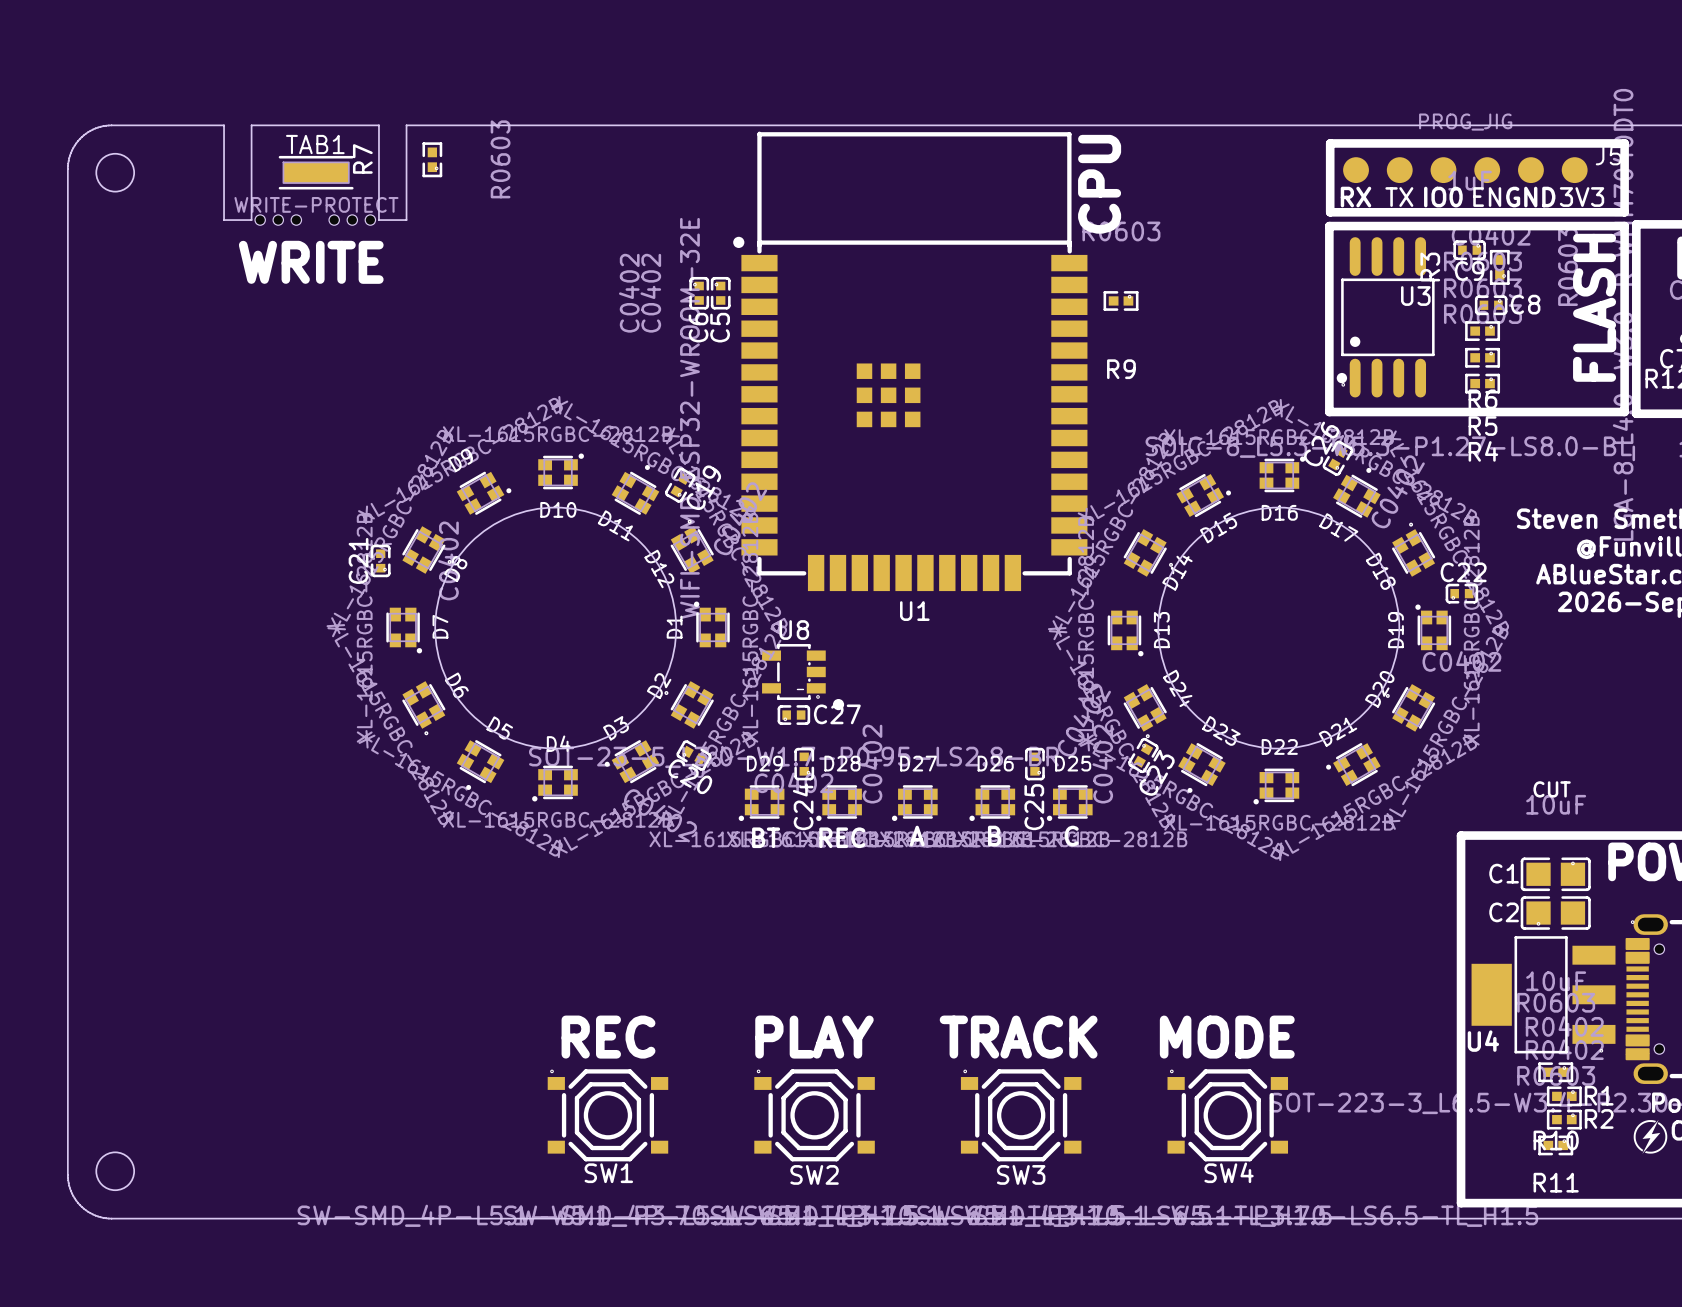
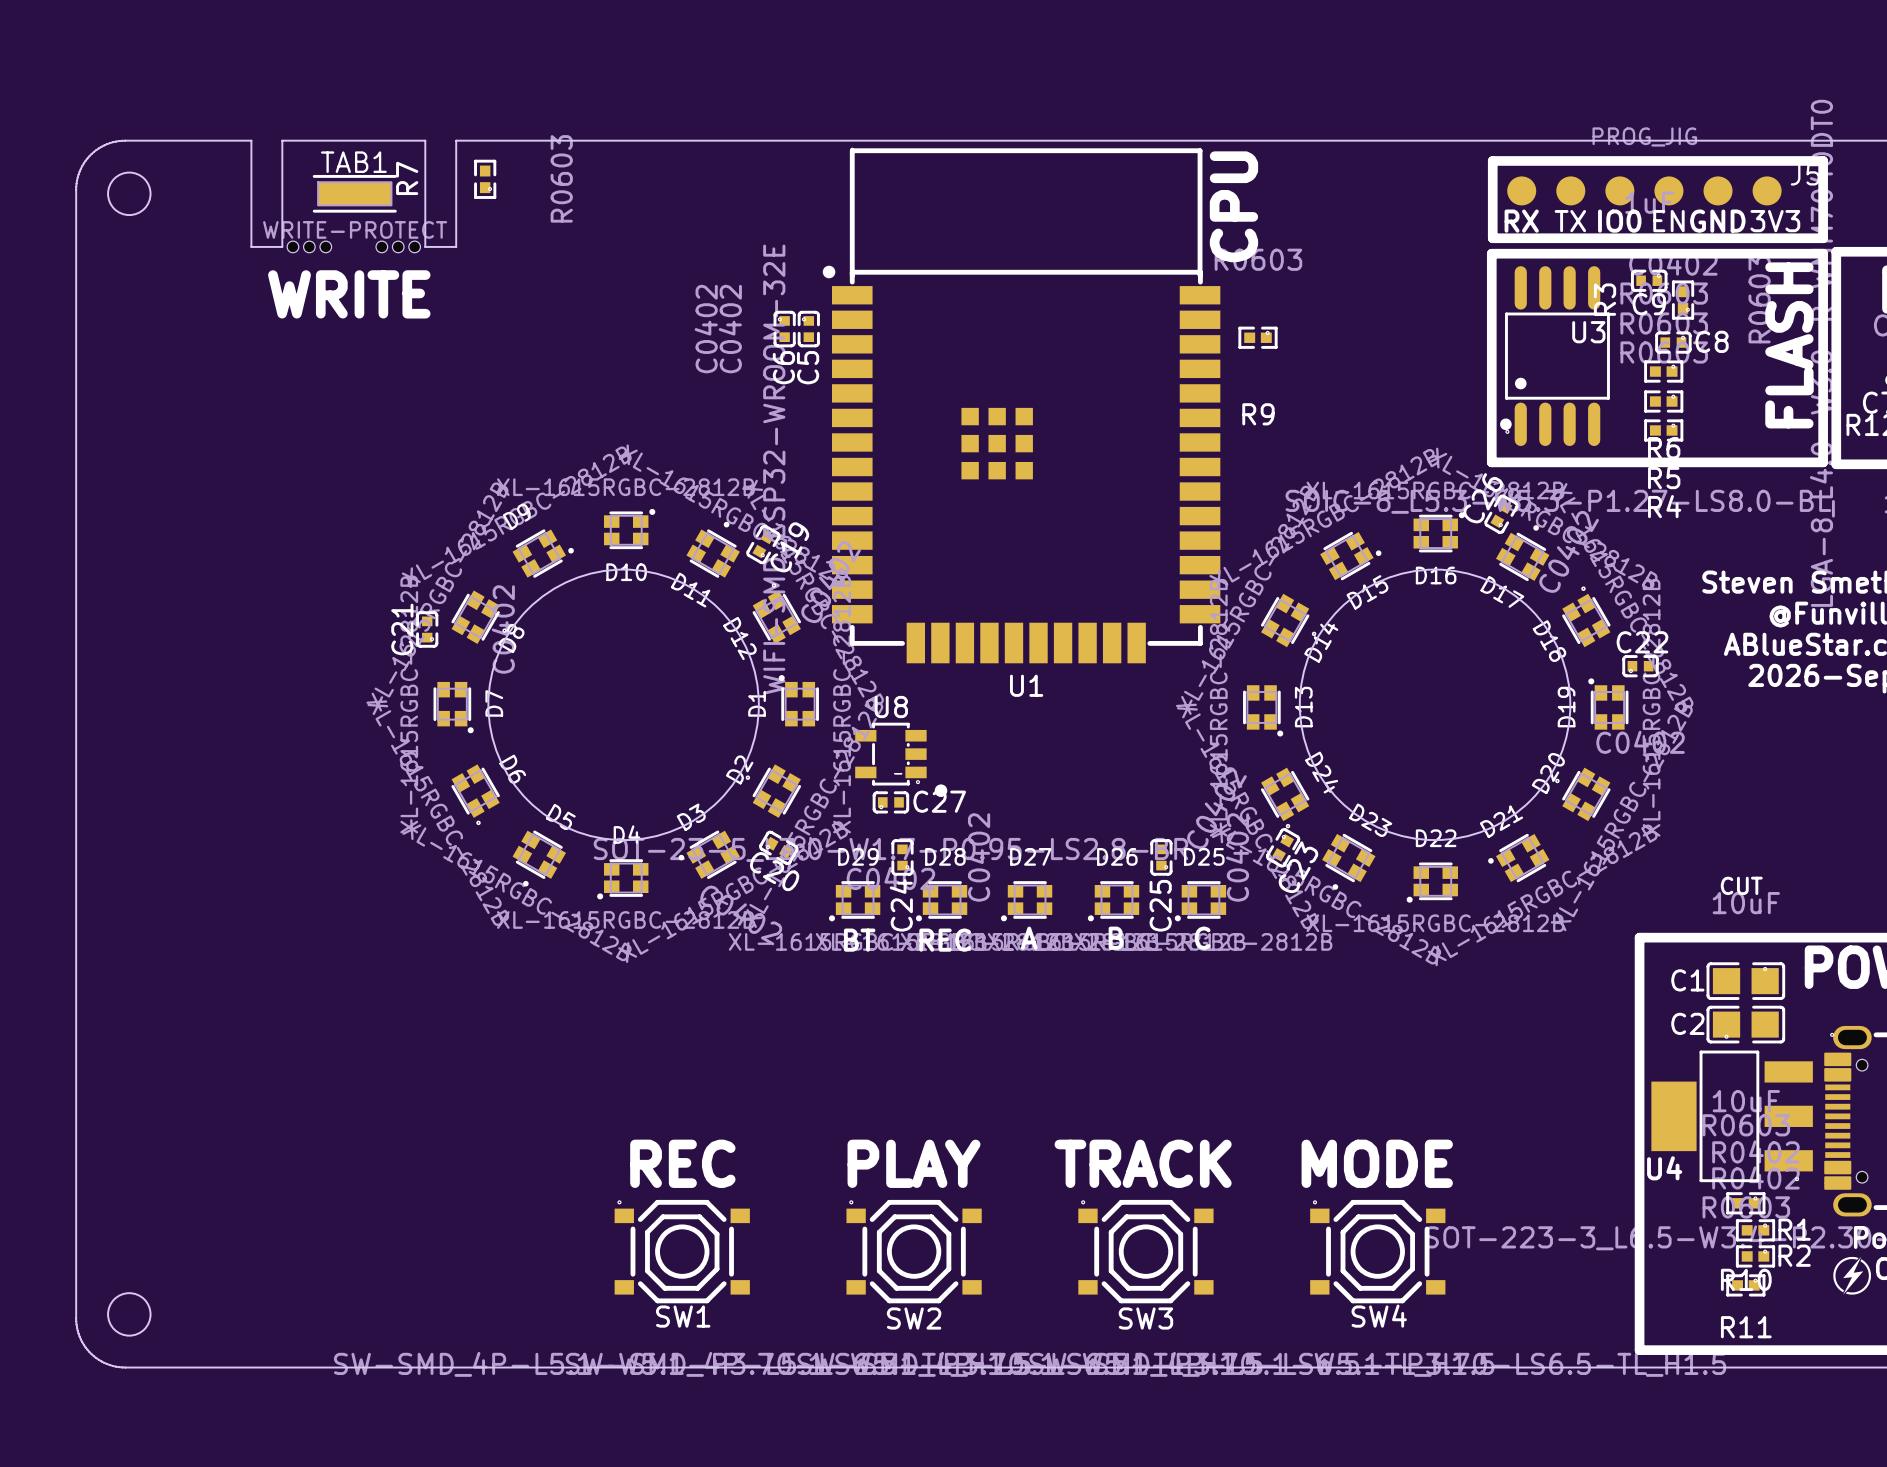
part footprint: [255, 214, 376, 226] -> [287, 241, 421, 253]

